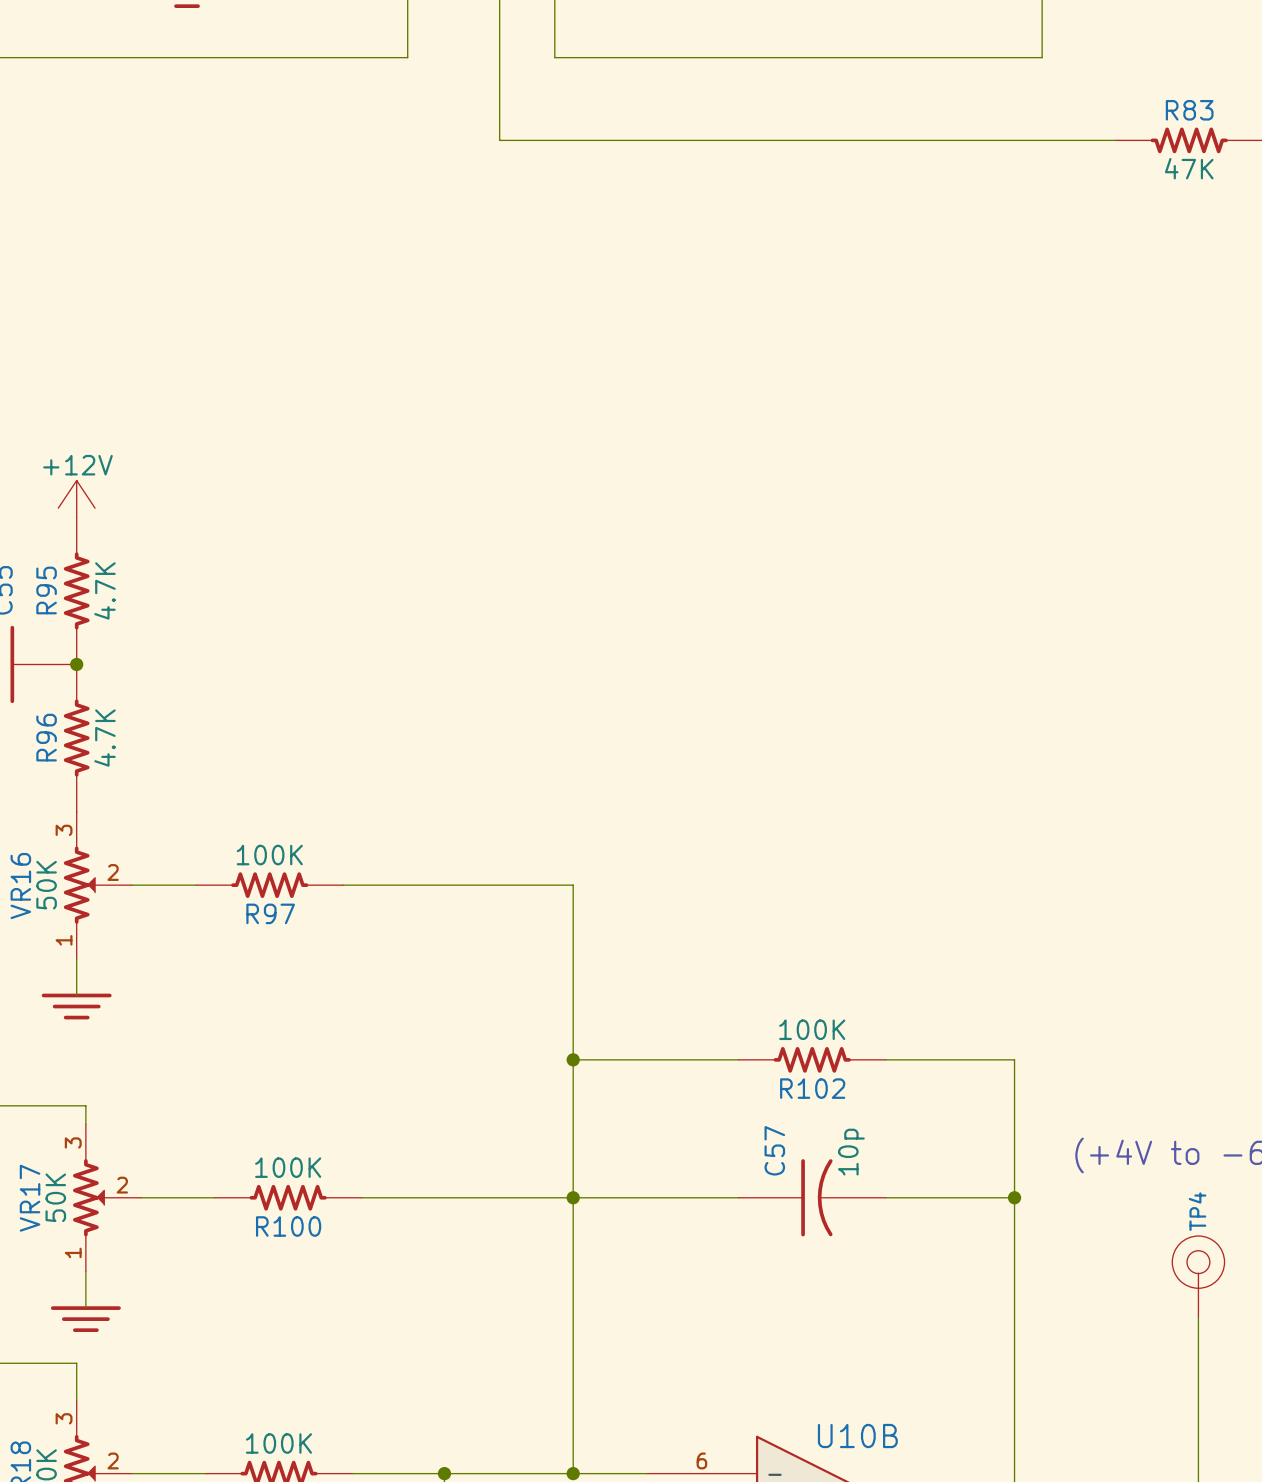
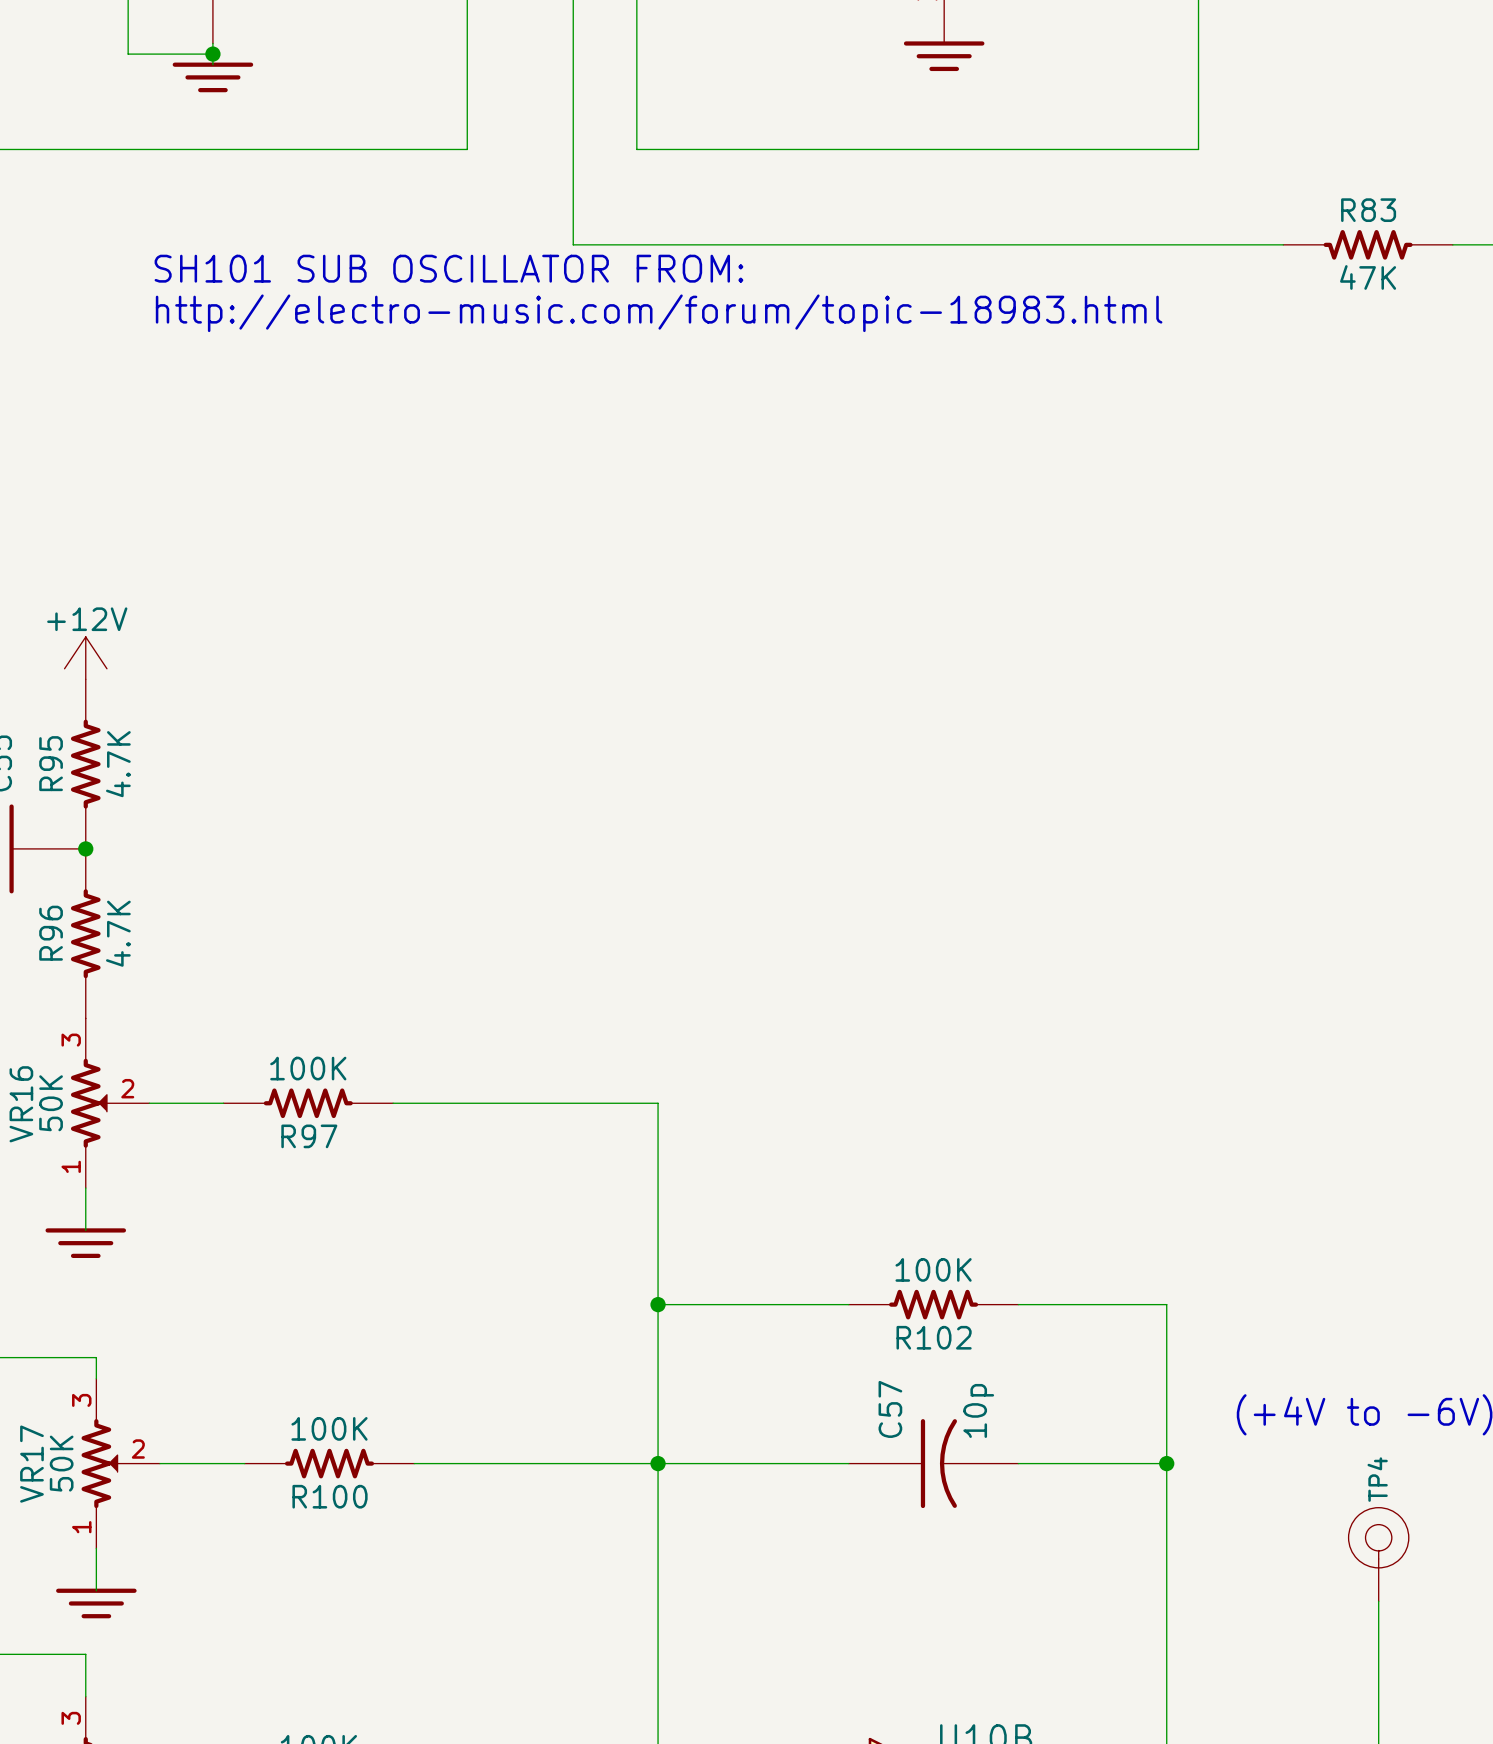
text: none -> SH101 SUB OSCILLATOR FROM: (448, 268)
text: none -> http://electro-music.com/forum/topic-18983.html (659, 313)

